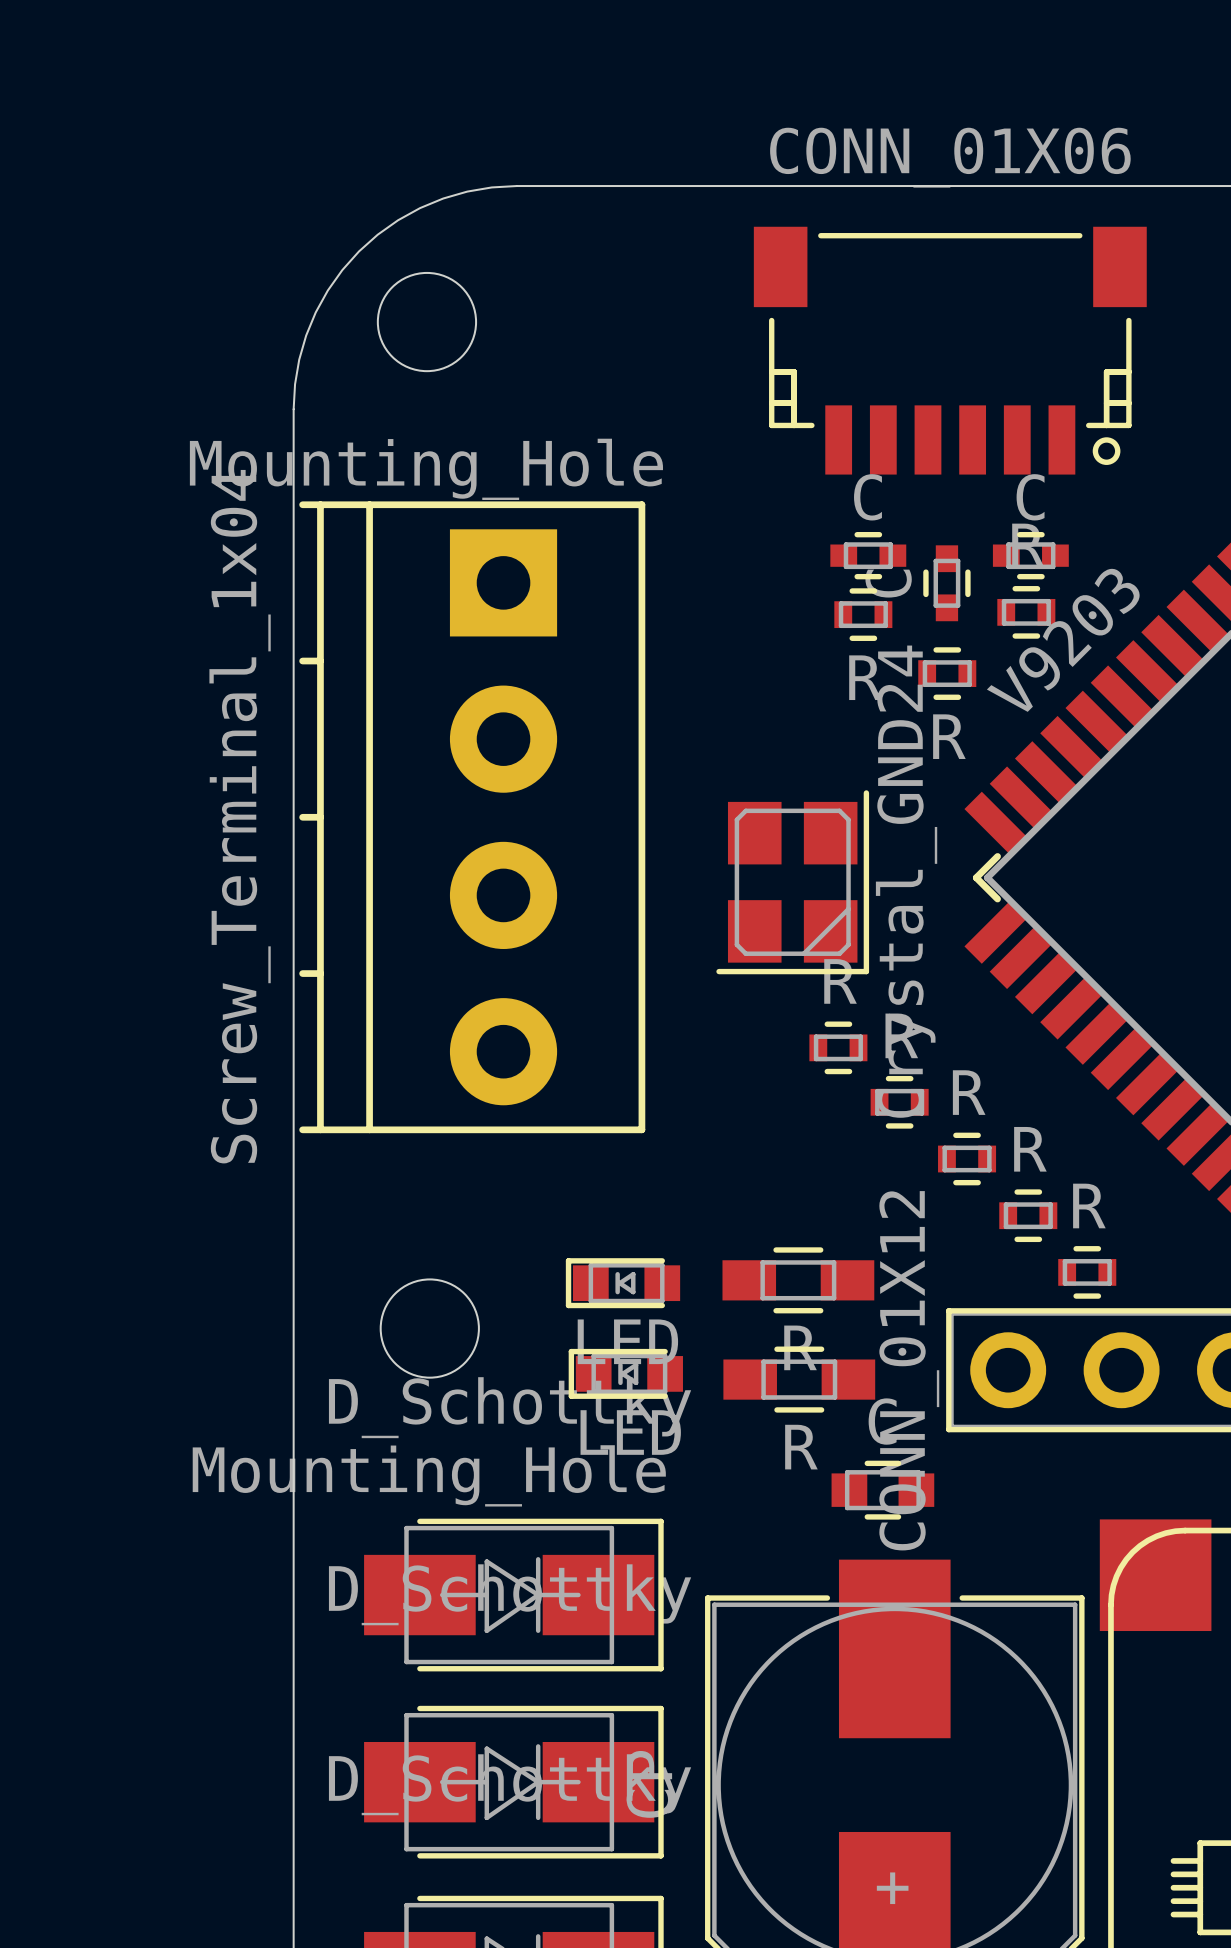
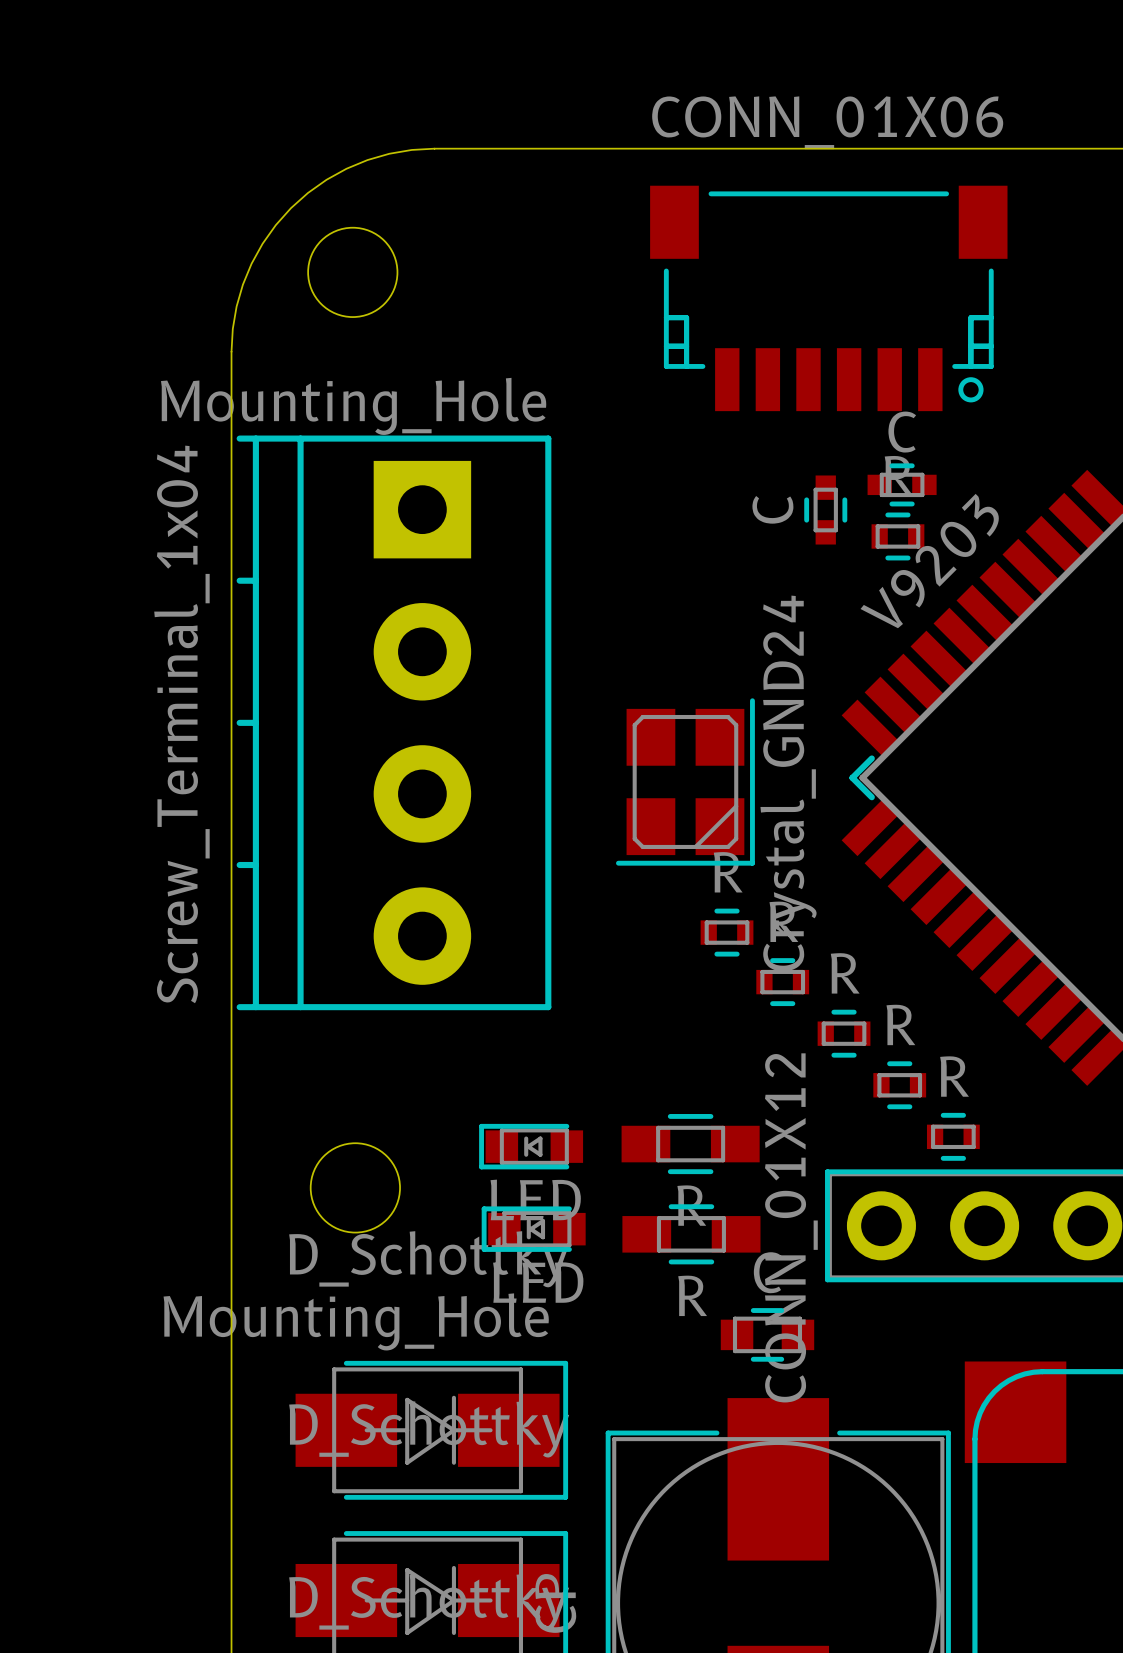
part: C (868, 555) -> none
part: R (863, 614) -> none
part: R (947, 673) -> none

